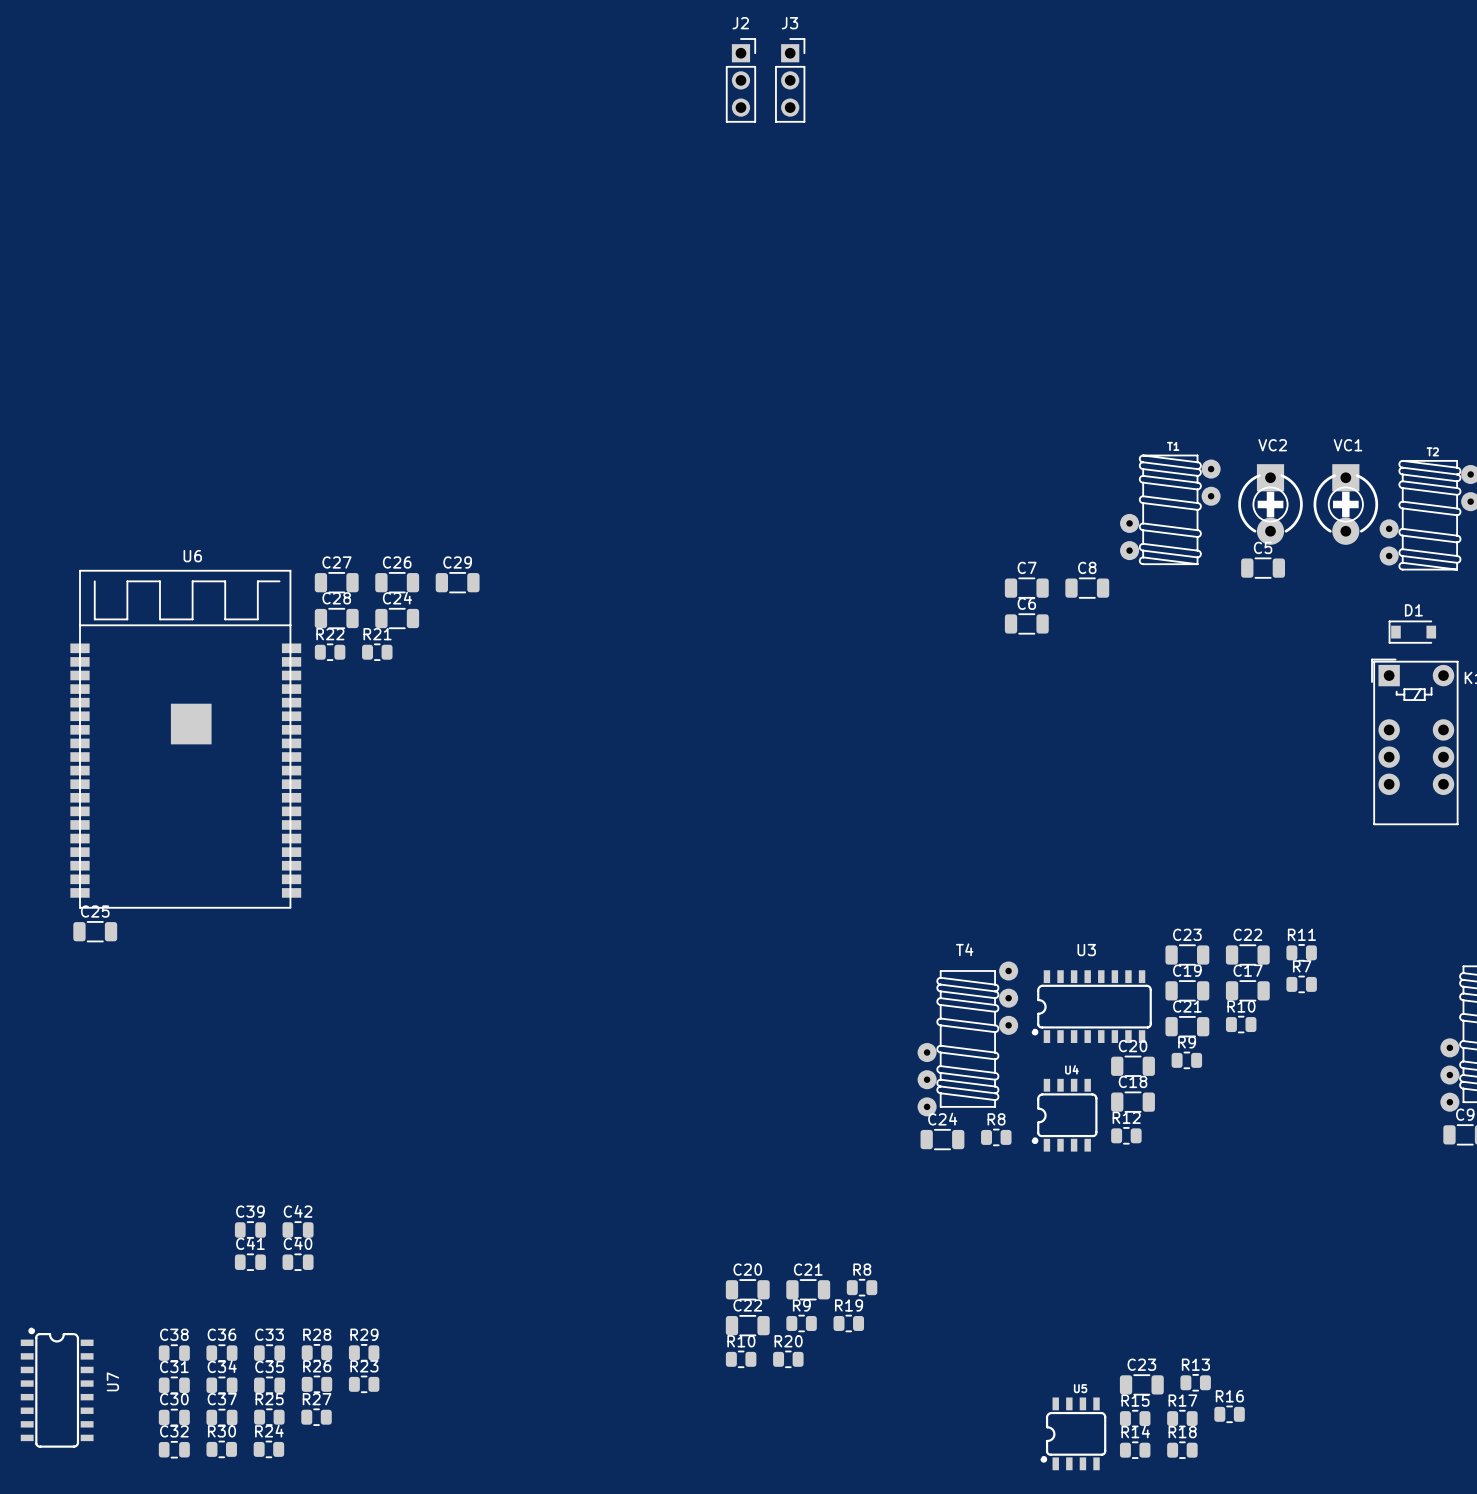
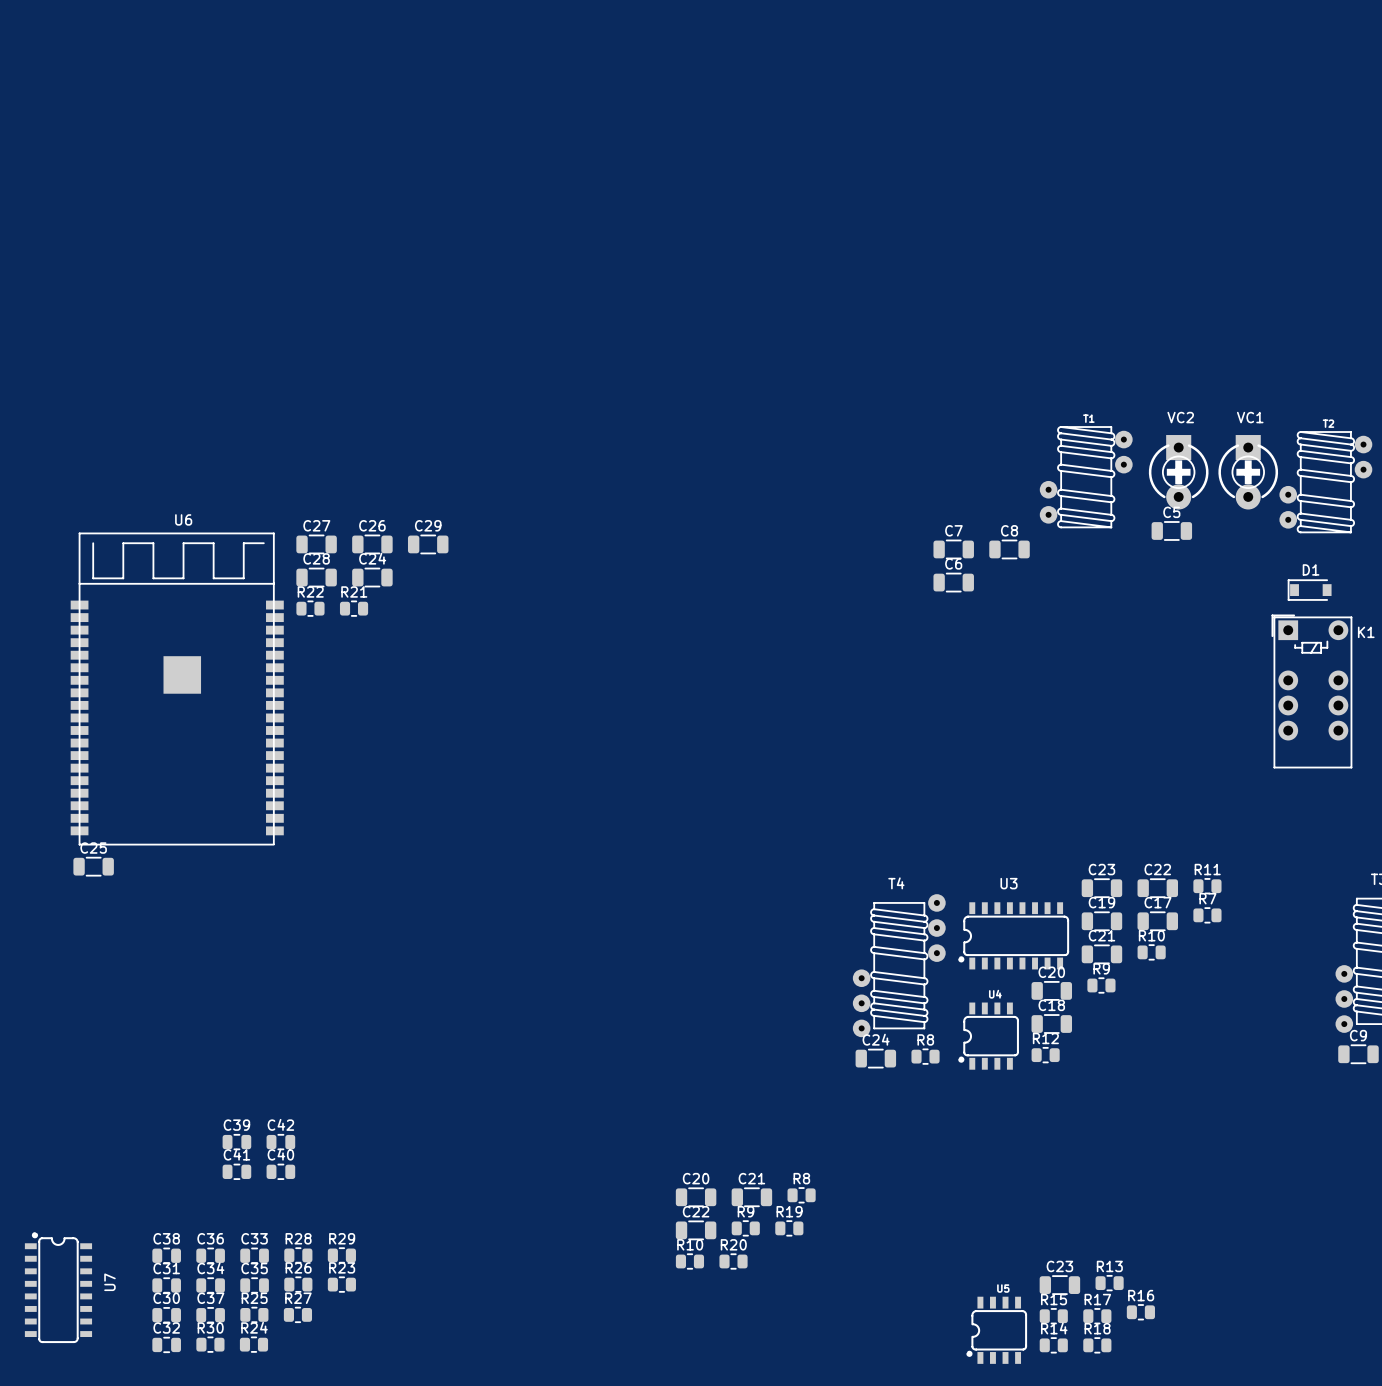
J2: (740, 80) -> none
J3: (790, 80) -> none

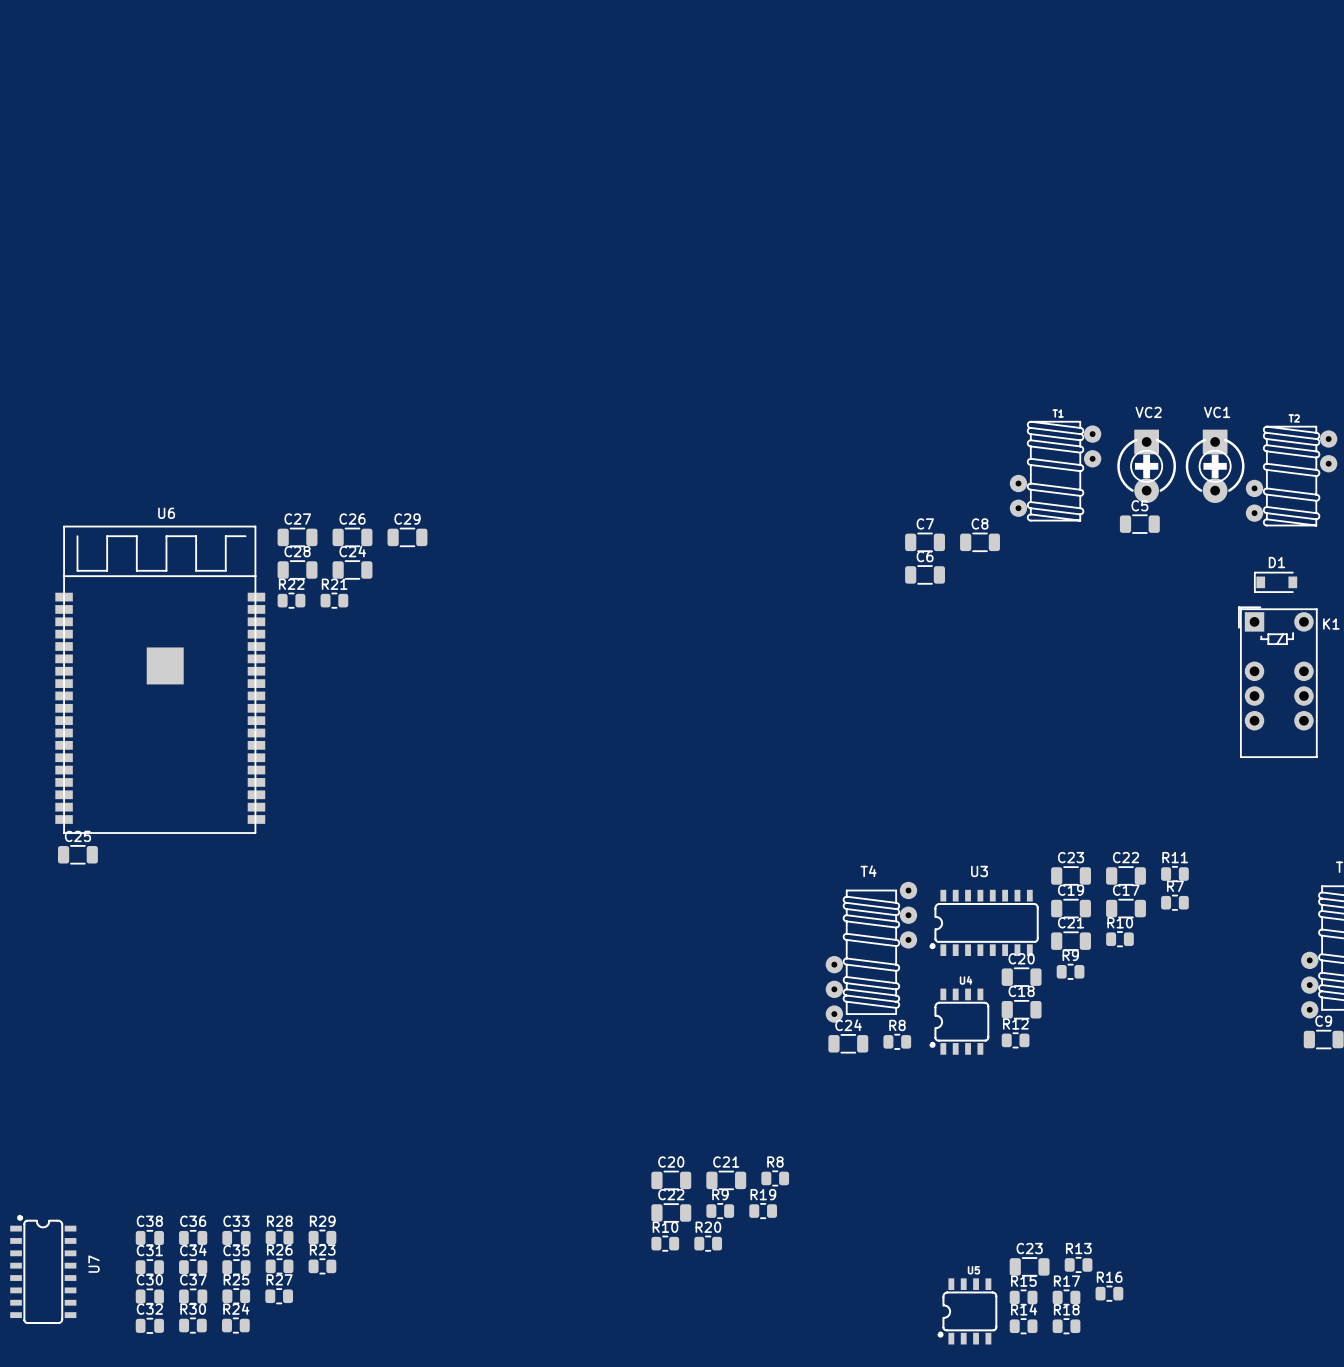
C39: (236, 1142) -> none
C42: (280, 1142) -> none
C41: (236, 1171) -> none
C40: (280, 1171) -> none

